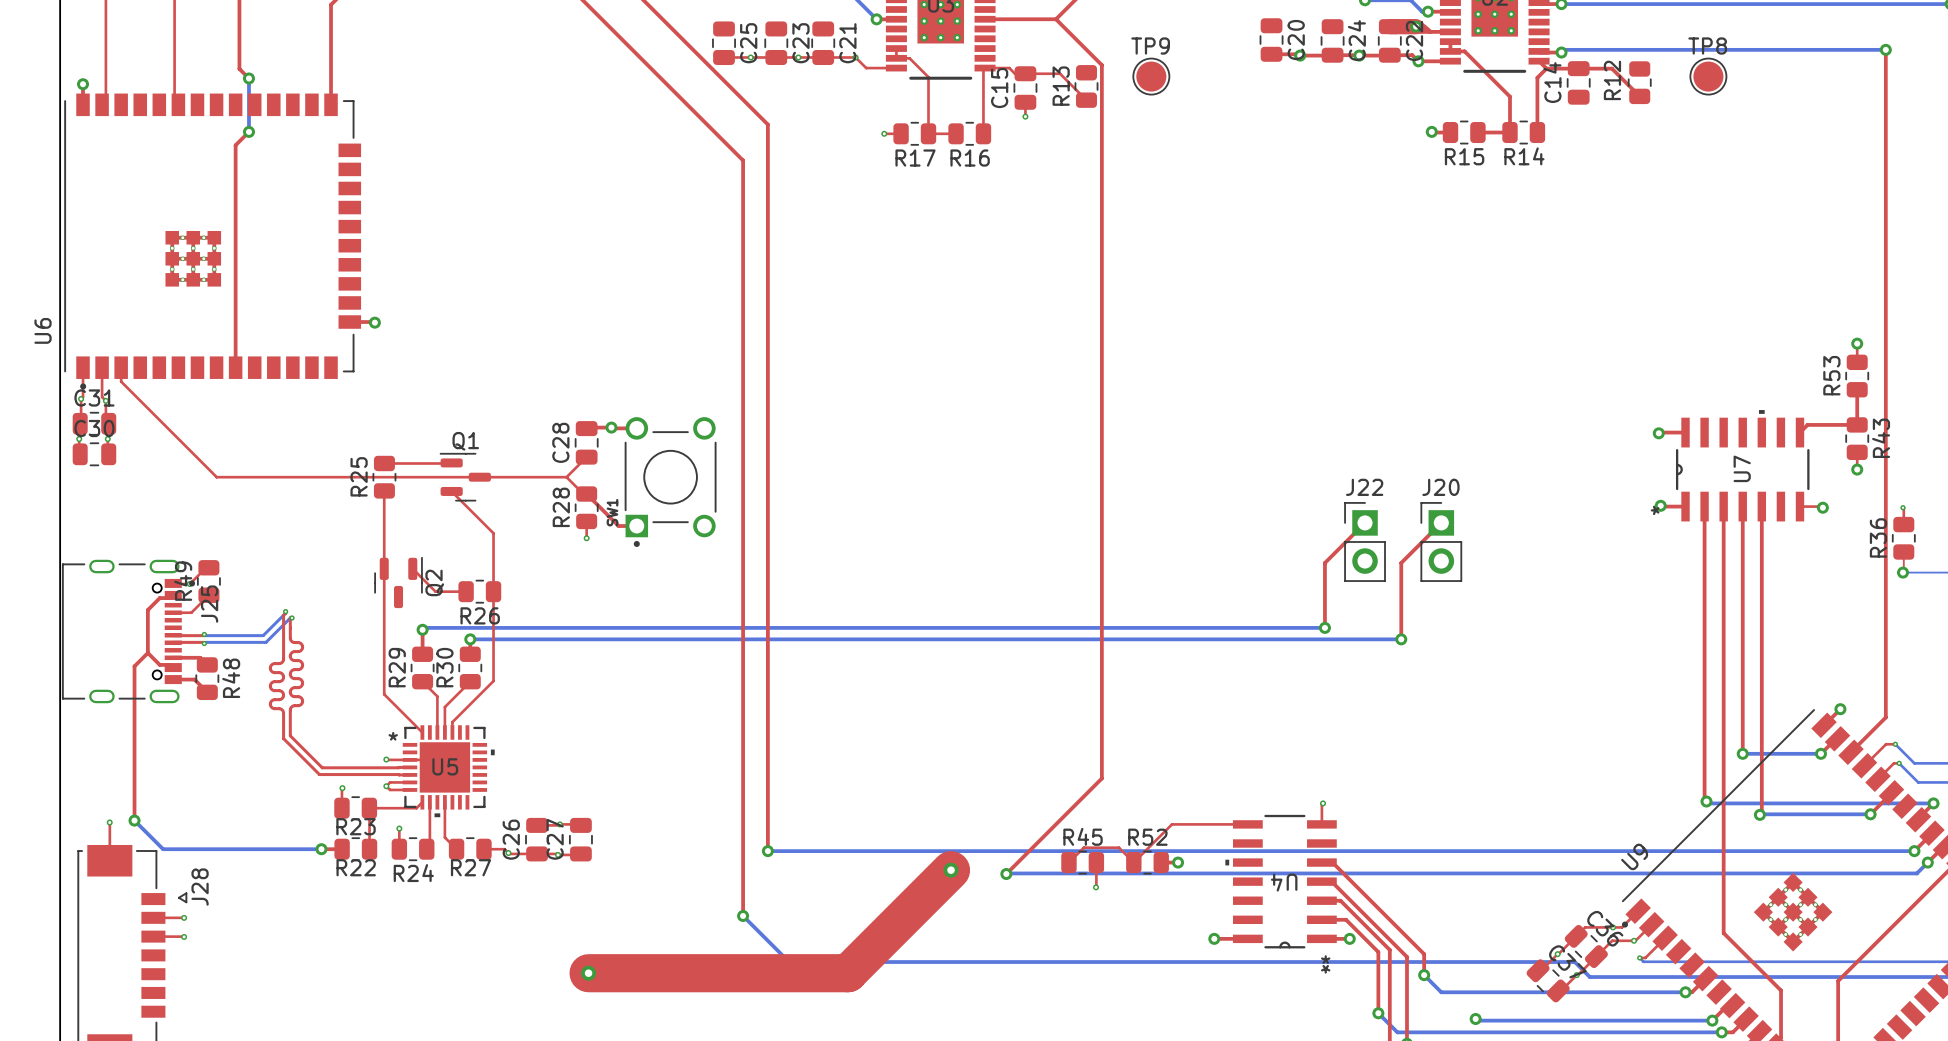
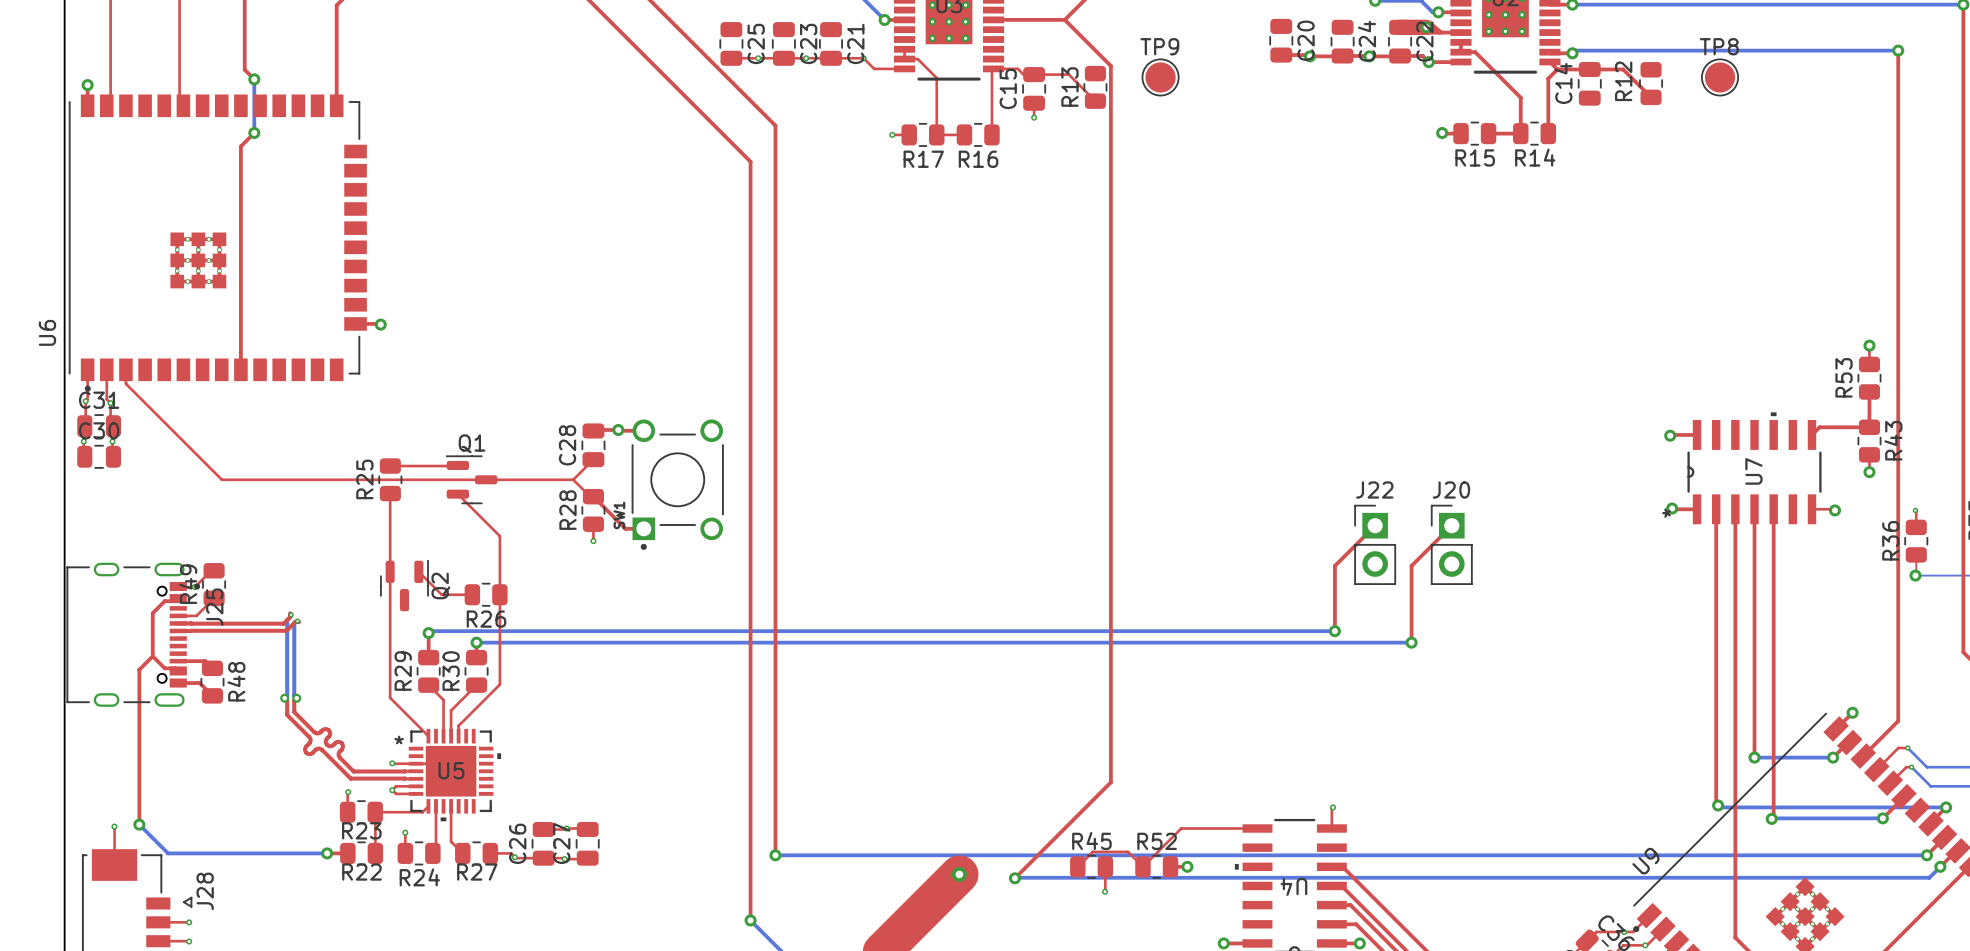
top track: none -> (290, 613) (290, 617) (283, 623) (178, 623)
bottom track: none -> (290, 613) (287, 620) (287, 695) (284, 698)
top track: (285, 611) (283, 615) (283, 660) (280, 663) (272, 664) (270, 668) (272, 672) (280, 672) (283, 676) (281, 680) (273, 681) (270, 686) (273, 690) (281, 691) (283, 696) (280, 699) (272, 700) (270, 704) (272, 708) (280, 708) (283, 711) (283, 738) (319, 774) (398, 774) -> (287, 700) (284, 698) (287, 700) (287, 715) (310, 738) (305, 748) (307, 753) (311, 753) (317, 748) (321, 749) (350, 778) (405, 778)
bottom track: (285, 611) (263, 635) (204, 634) -> none
bottom track: (292, 617) (266, 642) (204, 643) -> none
top track: (290, 618) (290, 639) (300, 643) (302, 647) (300, 650) (293, 651) (290, 655) (292, 659) (300, 661) (302, 665) (300, 669) (290, 672) (291, 677) (300, 679) (302, 683) (300, 687) (292, 688) (290, 693) (293, 696) (300, 697) (302, 701) (300, 705) (290, 708) (290, 735) (322, 767) (398, 767) -> (294, 700) (296, 698) (294, 700) (294, 712) (314, 732) (318, 733) (325, 729) (329, 730) (329, 735) (325, 741) (327, 744) (331, 746) (337, 741) (341, 743) (342, 747) (339, 752) (339, 756) (353, 771) (405, 771)
top track: none -> (298, 622) (295, 622) (286, 630) (178, 630)
bottom track: none -> (298, 622) (294, 623) (294, 695) (296, 698)
top track: (204, 634) (173, 635) -> none
via: (204, 634) -> none
top track: (173, 642) (204, 643) -> none
via: (204, 643) -> none
via: none -> (284, 698)
via: none -> (296, 698)

